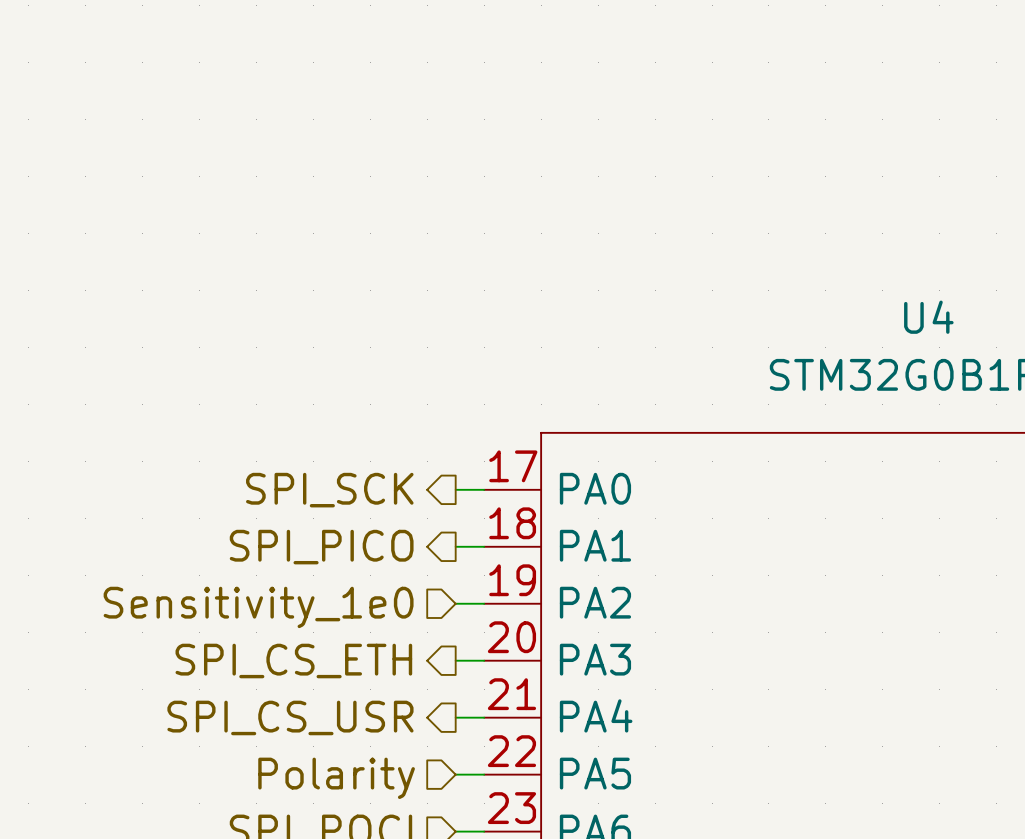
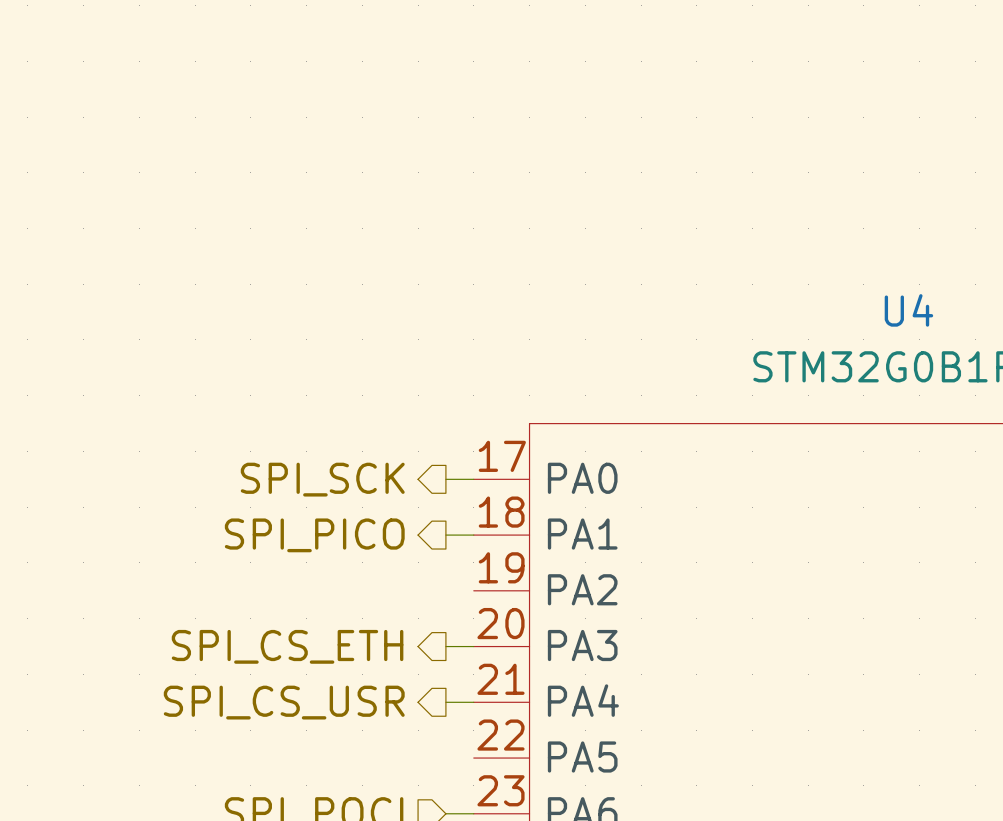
wire: (455, 603) (484, 603) -> none
hierarchical label: Sensitivity_1e0 (258, 607) -> none
wire: (455, 774) (484, 774) -> none
hierarchical label: Polarity (336, 778) -> none

